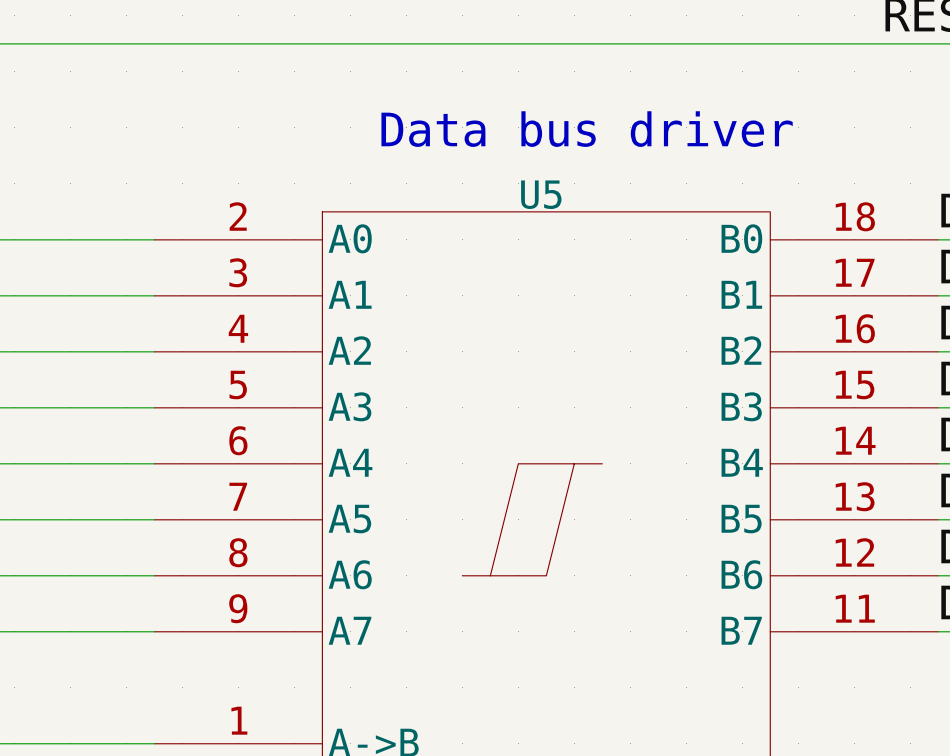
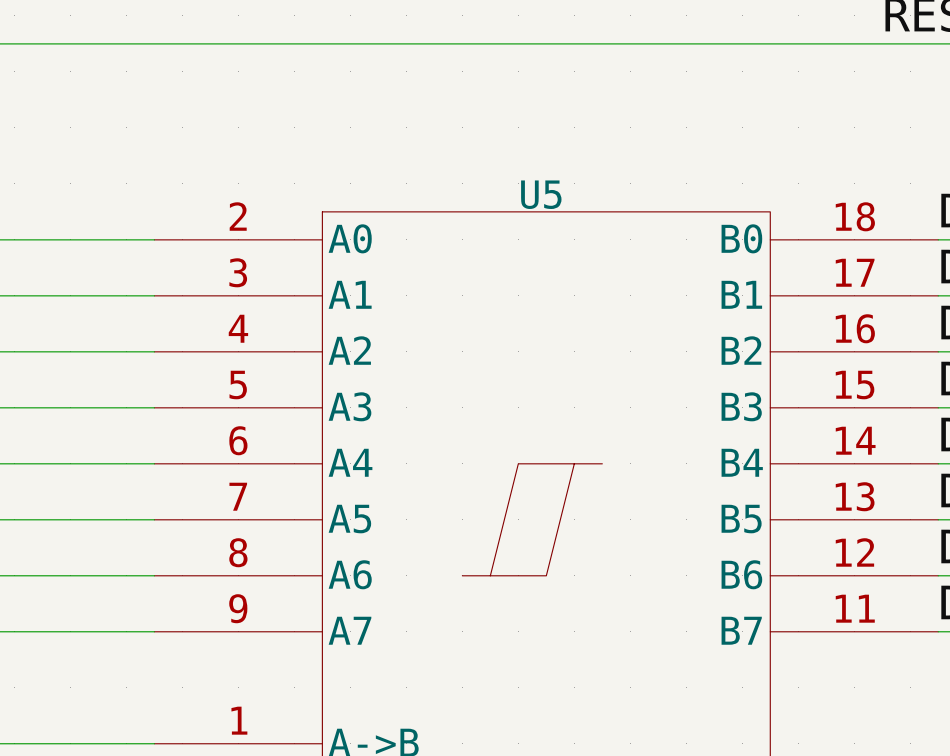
text: Data bus driver (587, 129) -> none

